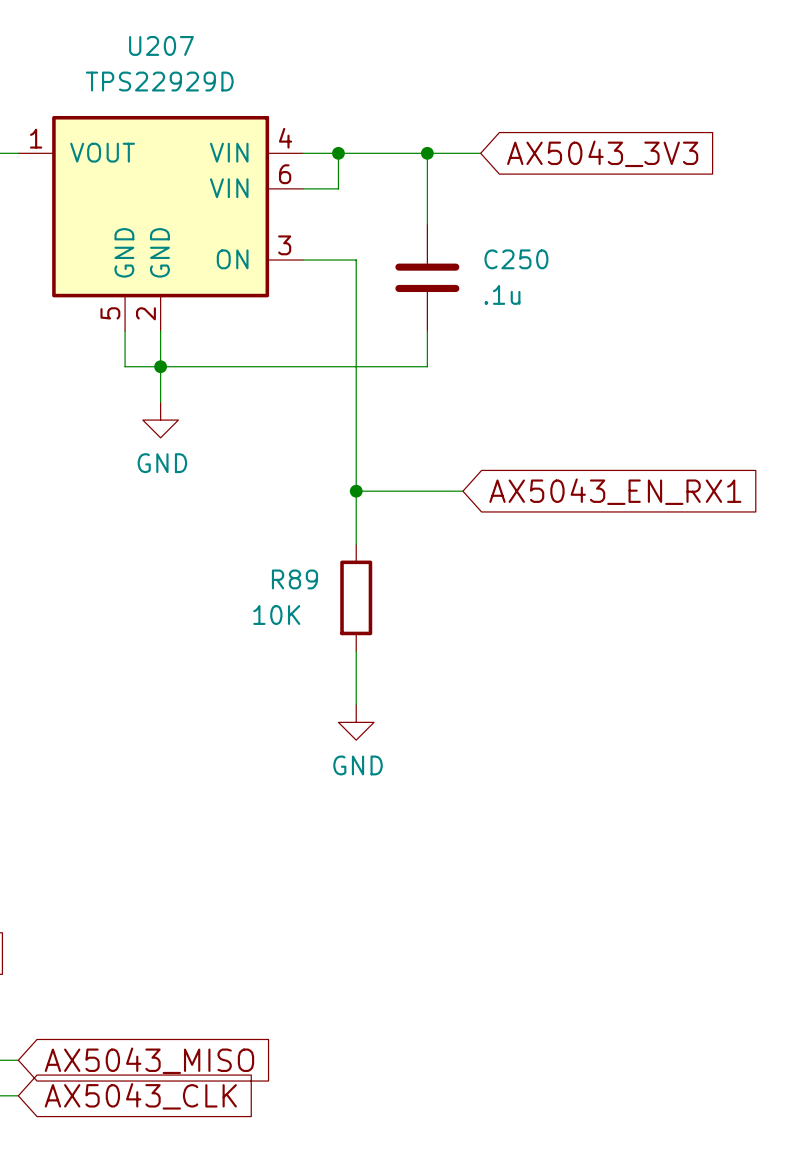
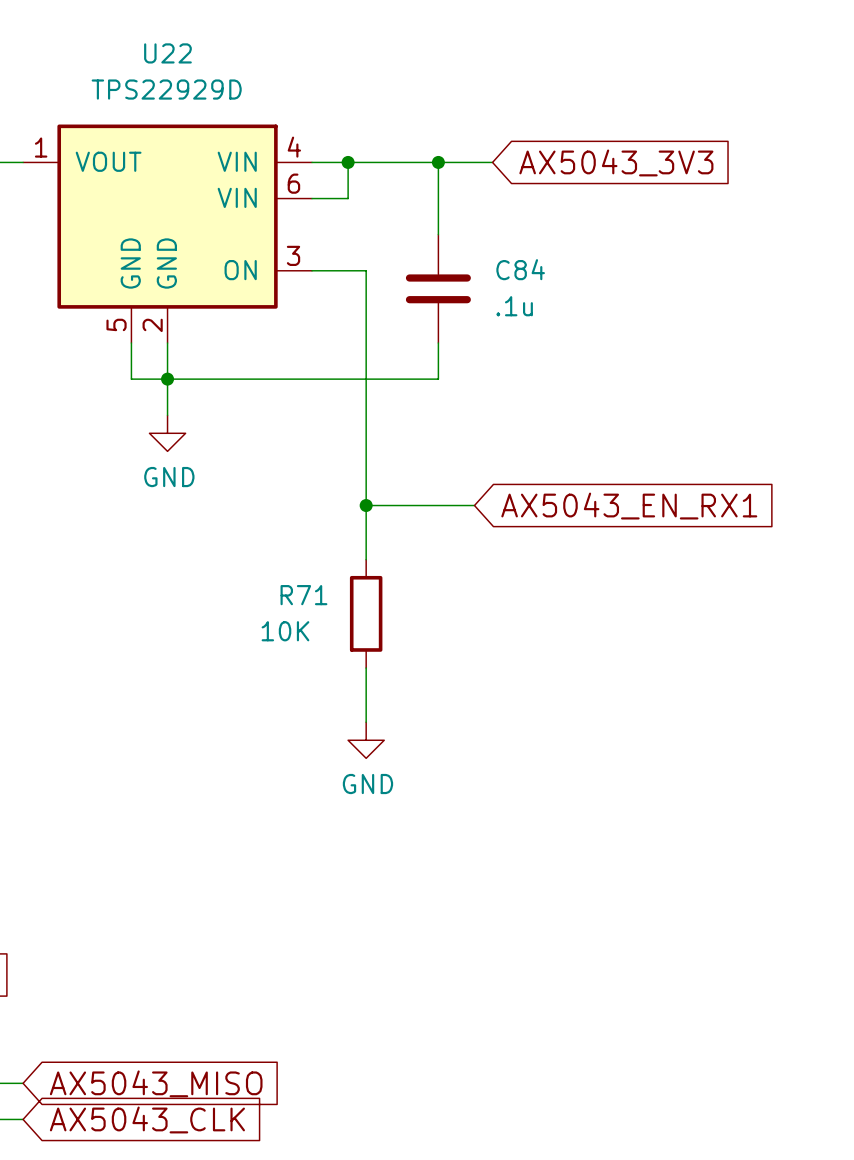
U207 name: U207 (161, 45) -> U22 (167, 53)
C250 name: C250 (516, 259) -> C84 (520, 269)
R89 name: R89 (294, 579) -> R71 (303, 595)

